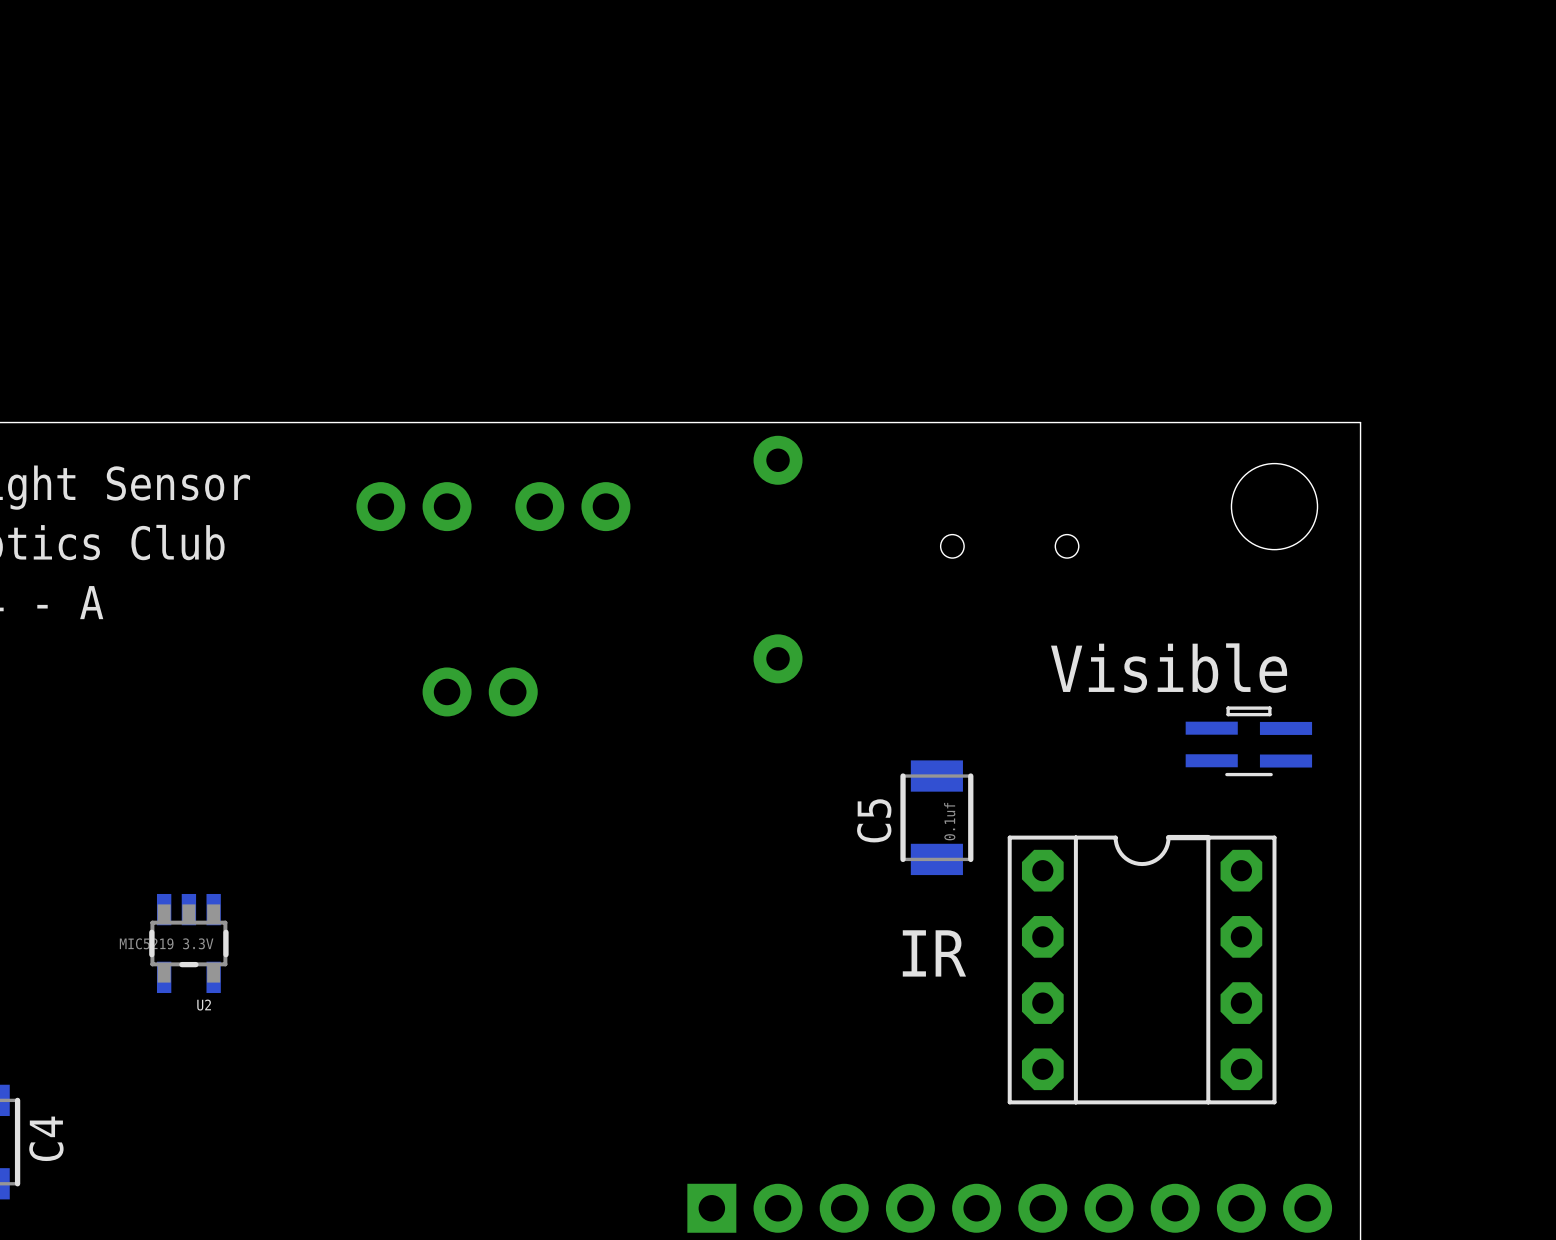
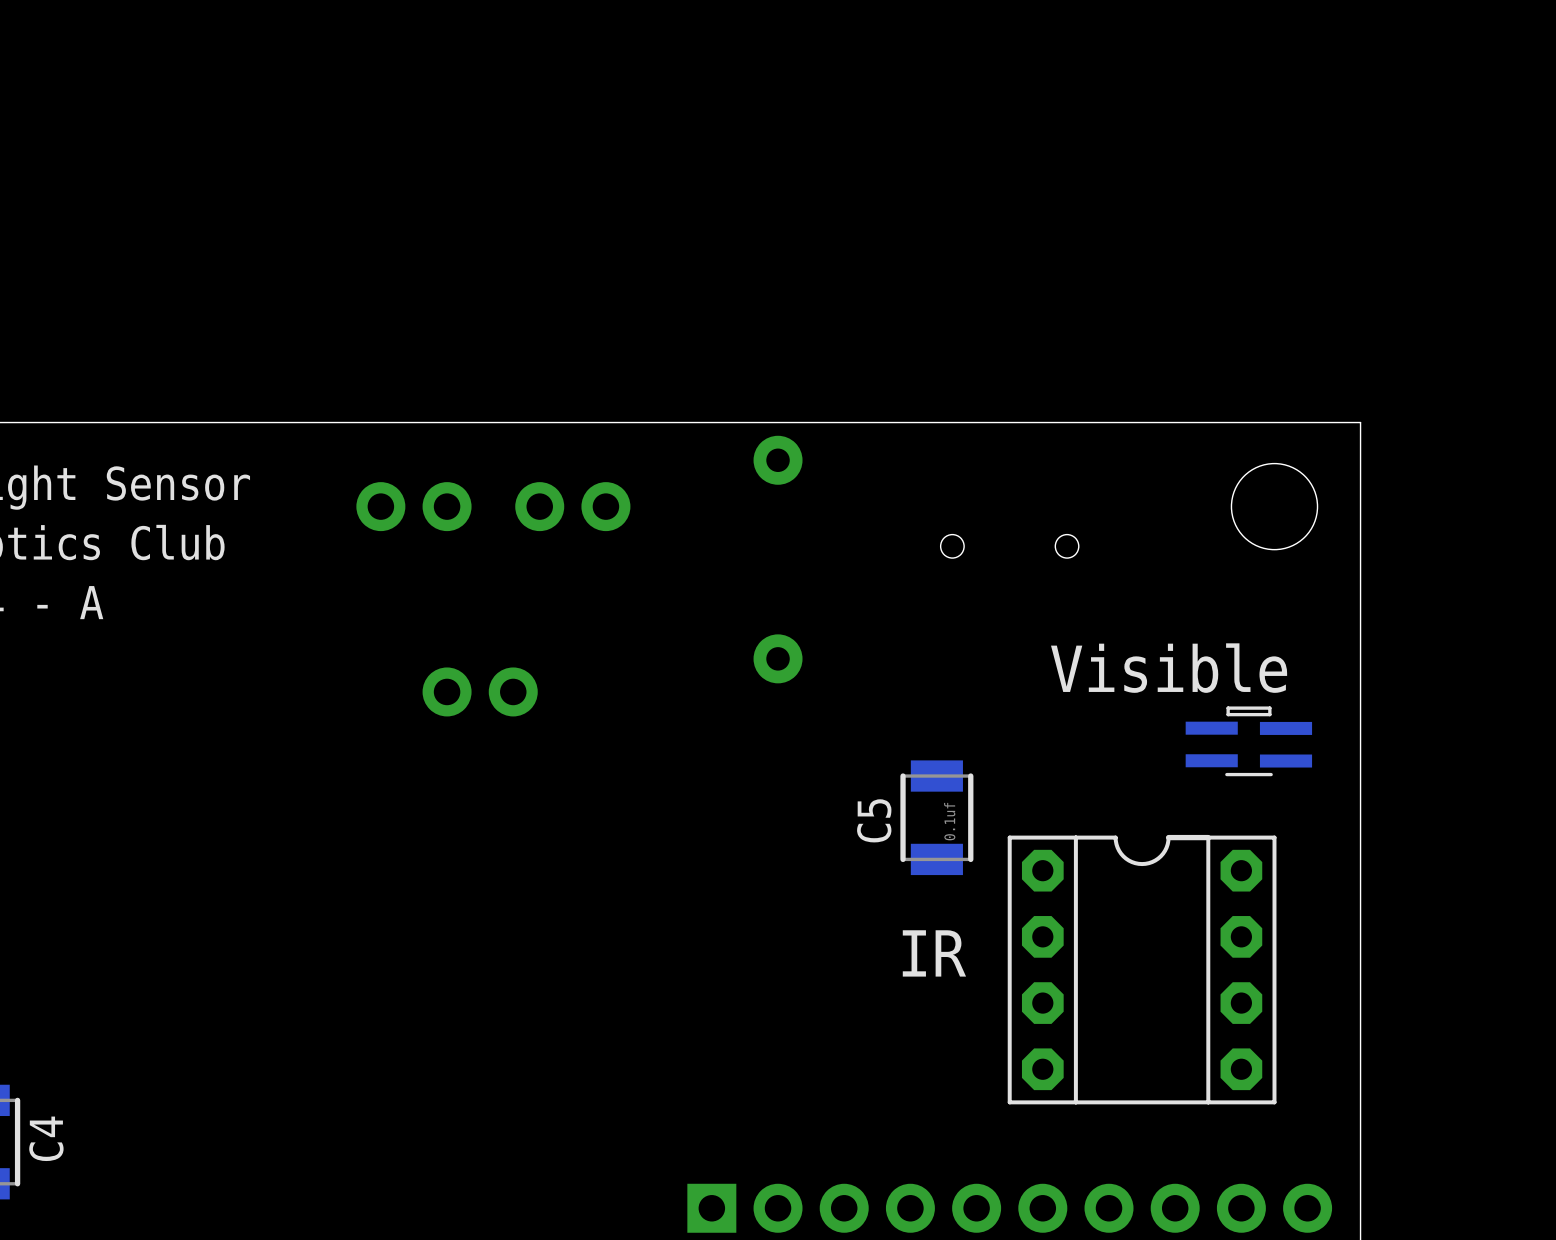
U2: MIC5219 3.3V (188, 943) -> none

